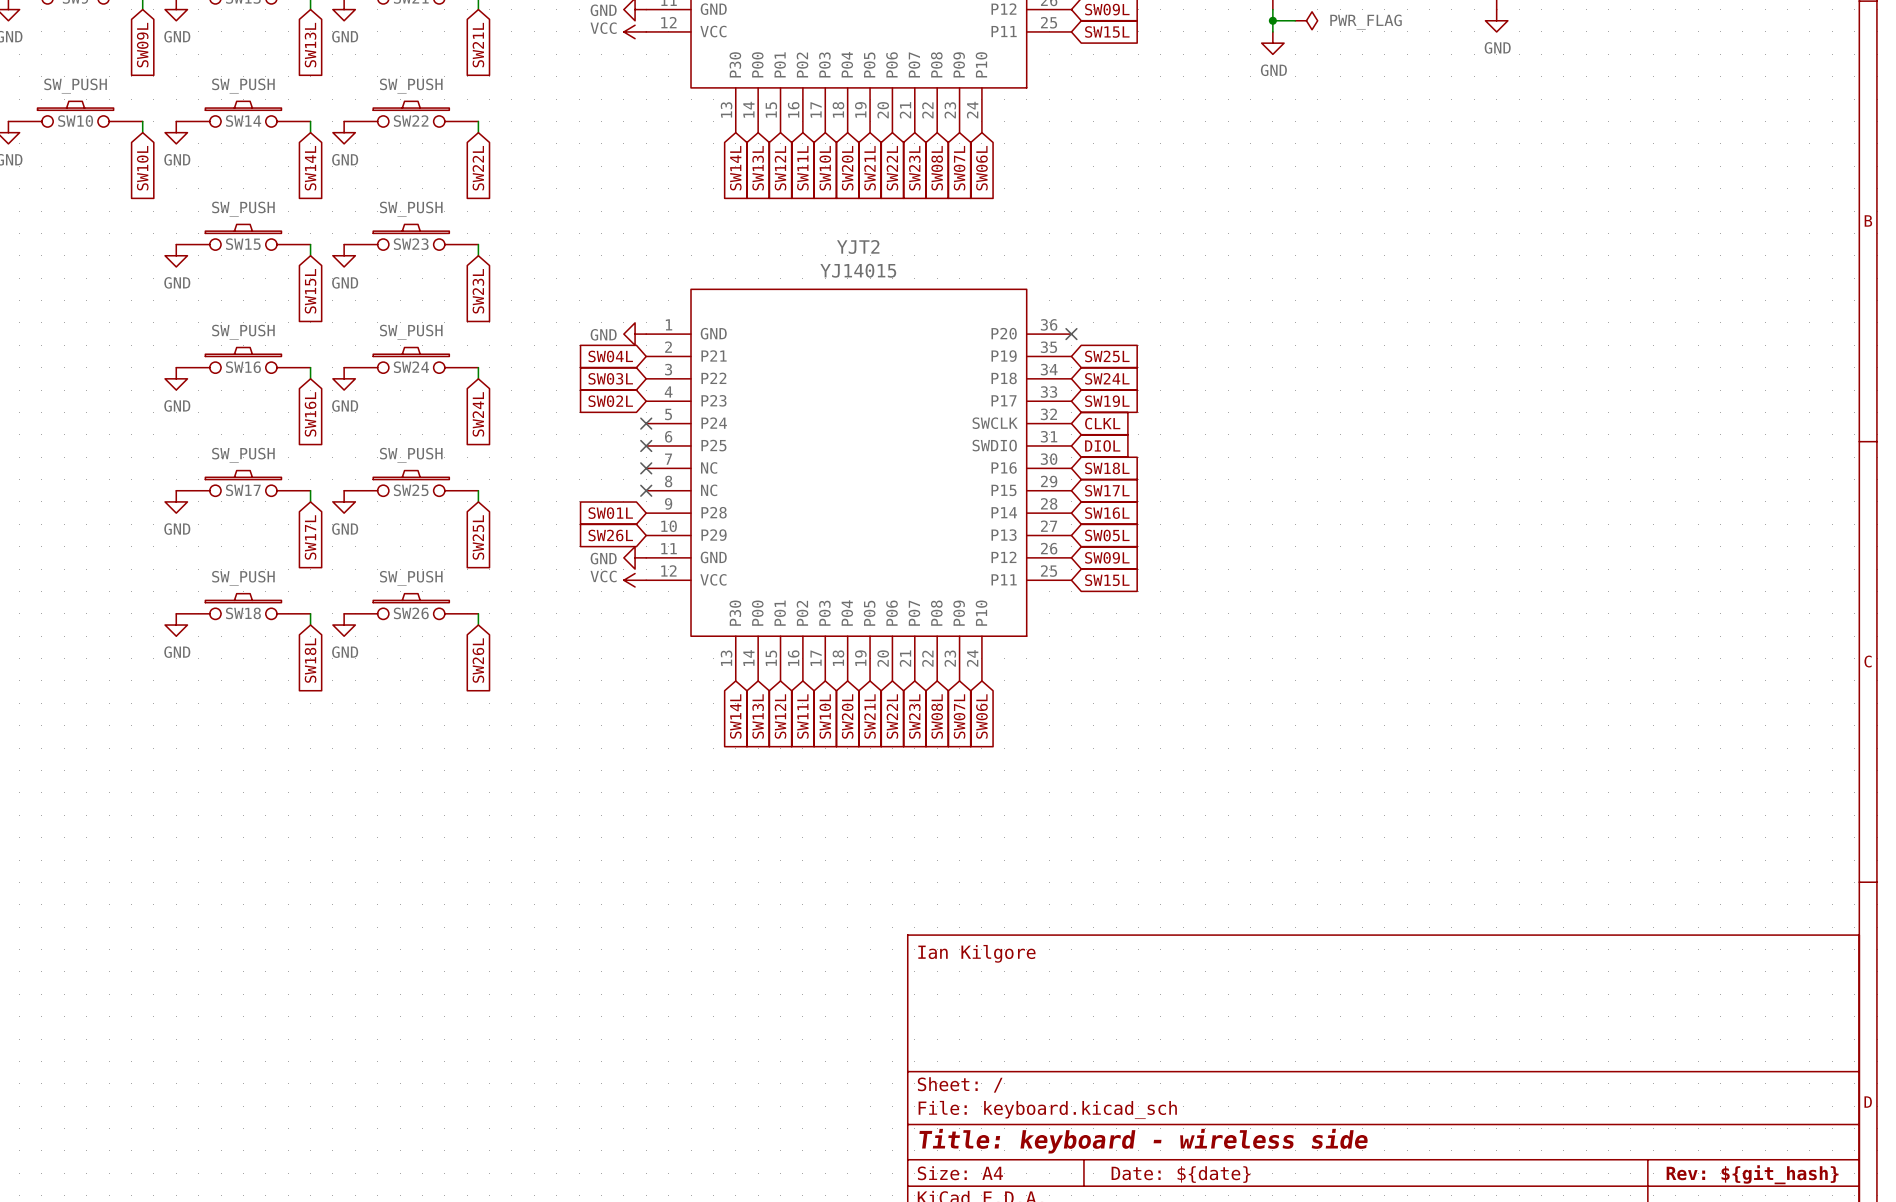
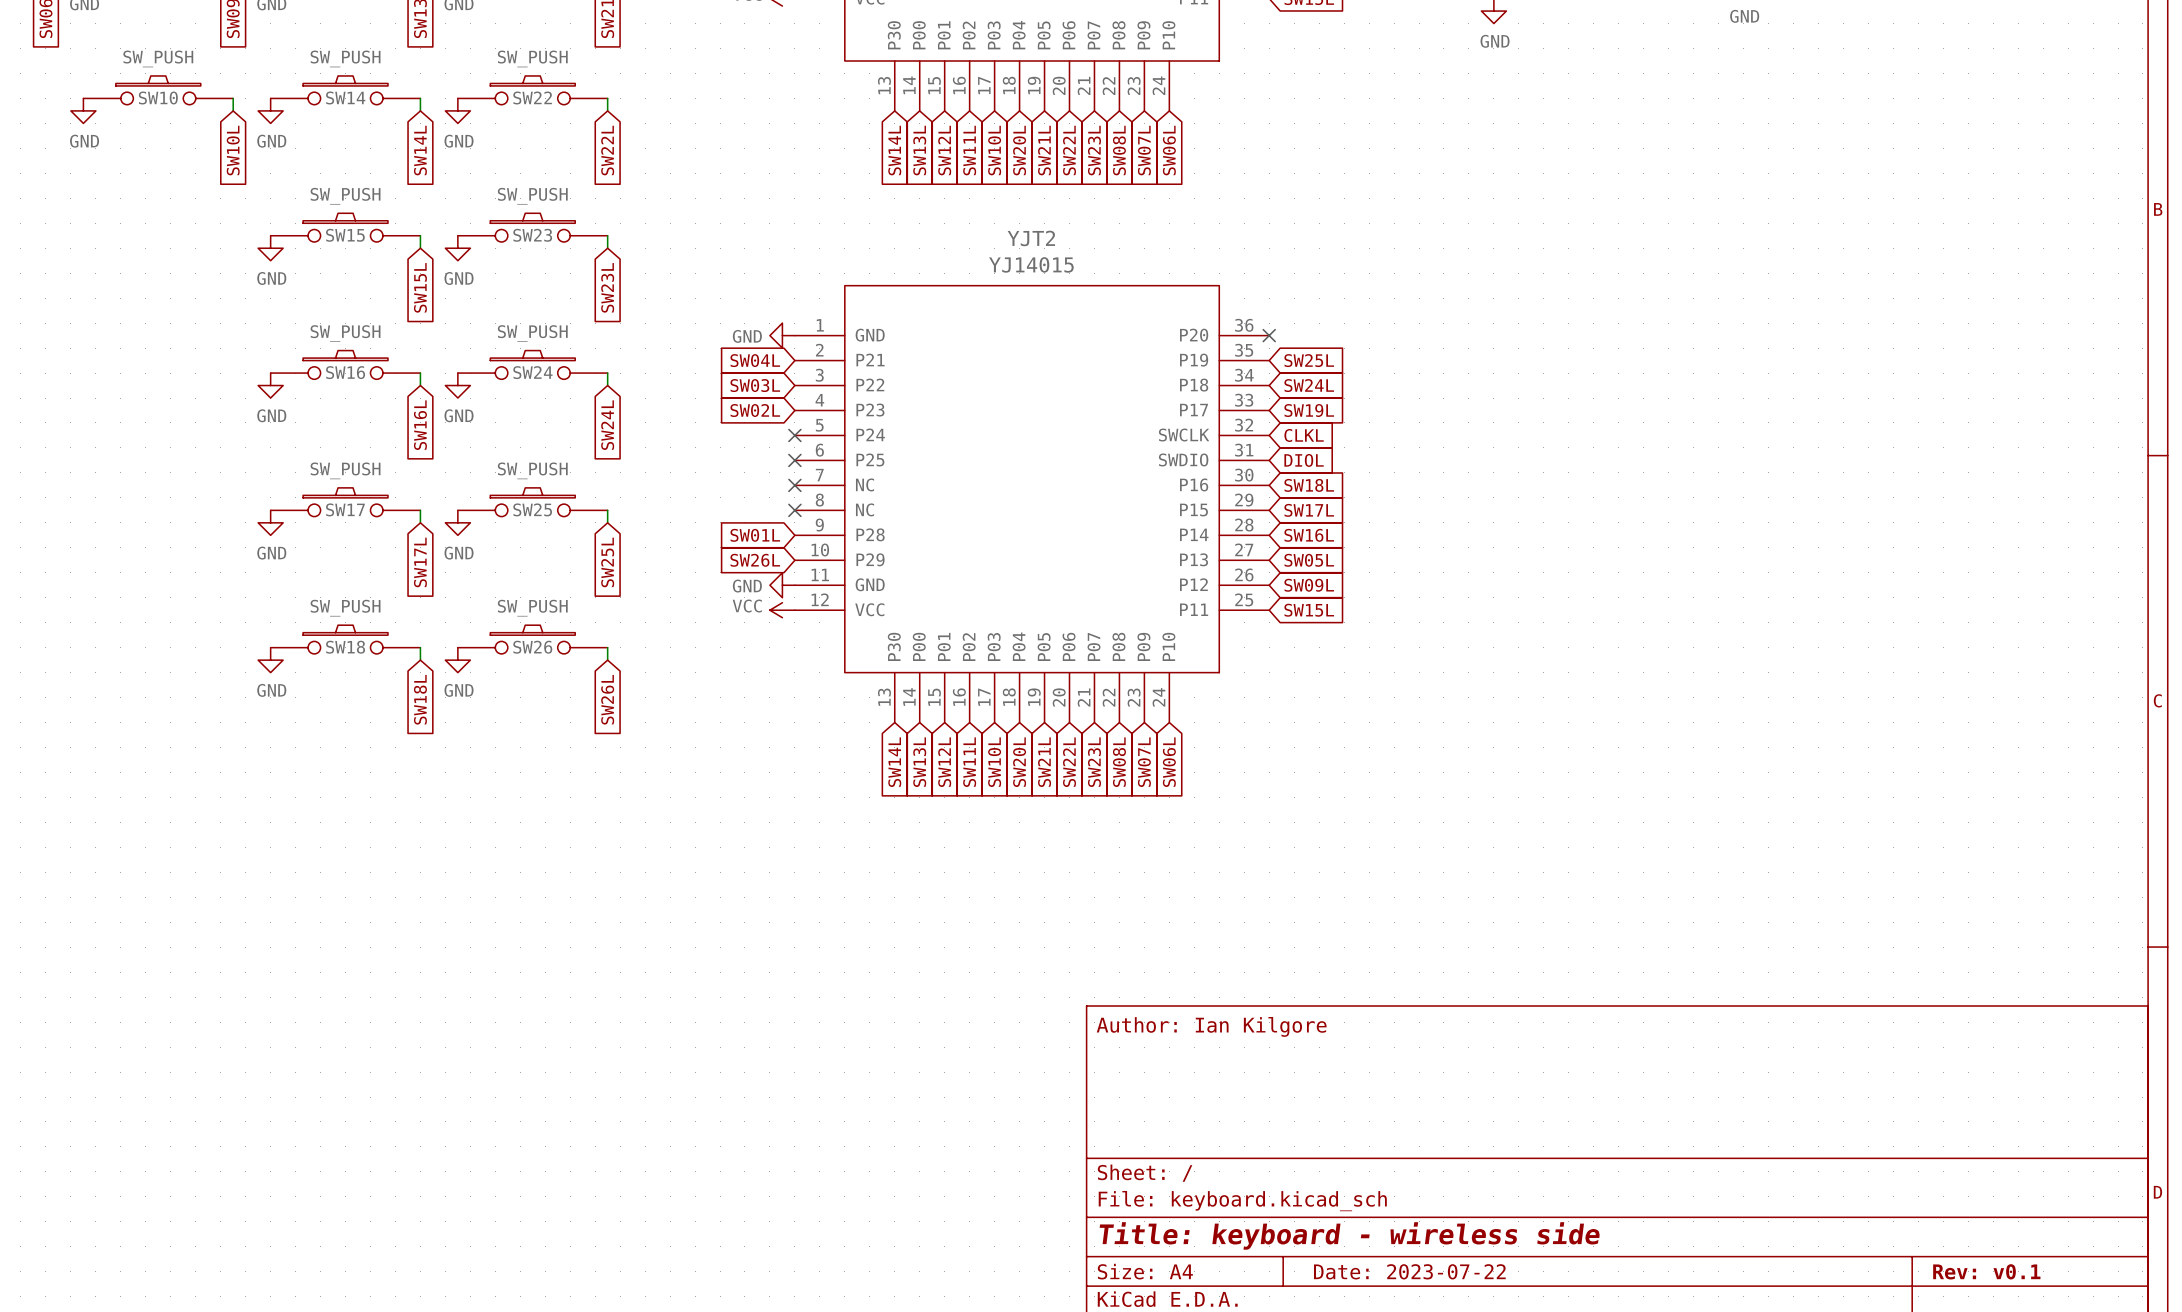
title block: Ian Kilgore (976, 953) -> Author: Ian Kilgore (1211, 1026)
title block: Date: ${date} (1180, 1174) -> Date: 2023-07-22 (1409, 1271)
title block: Rev: ${git_hash} (1752, 1174) -> Rev: v0.1 (1986, 1271)

